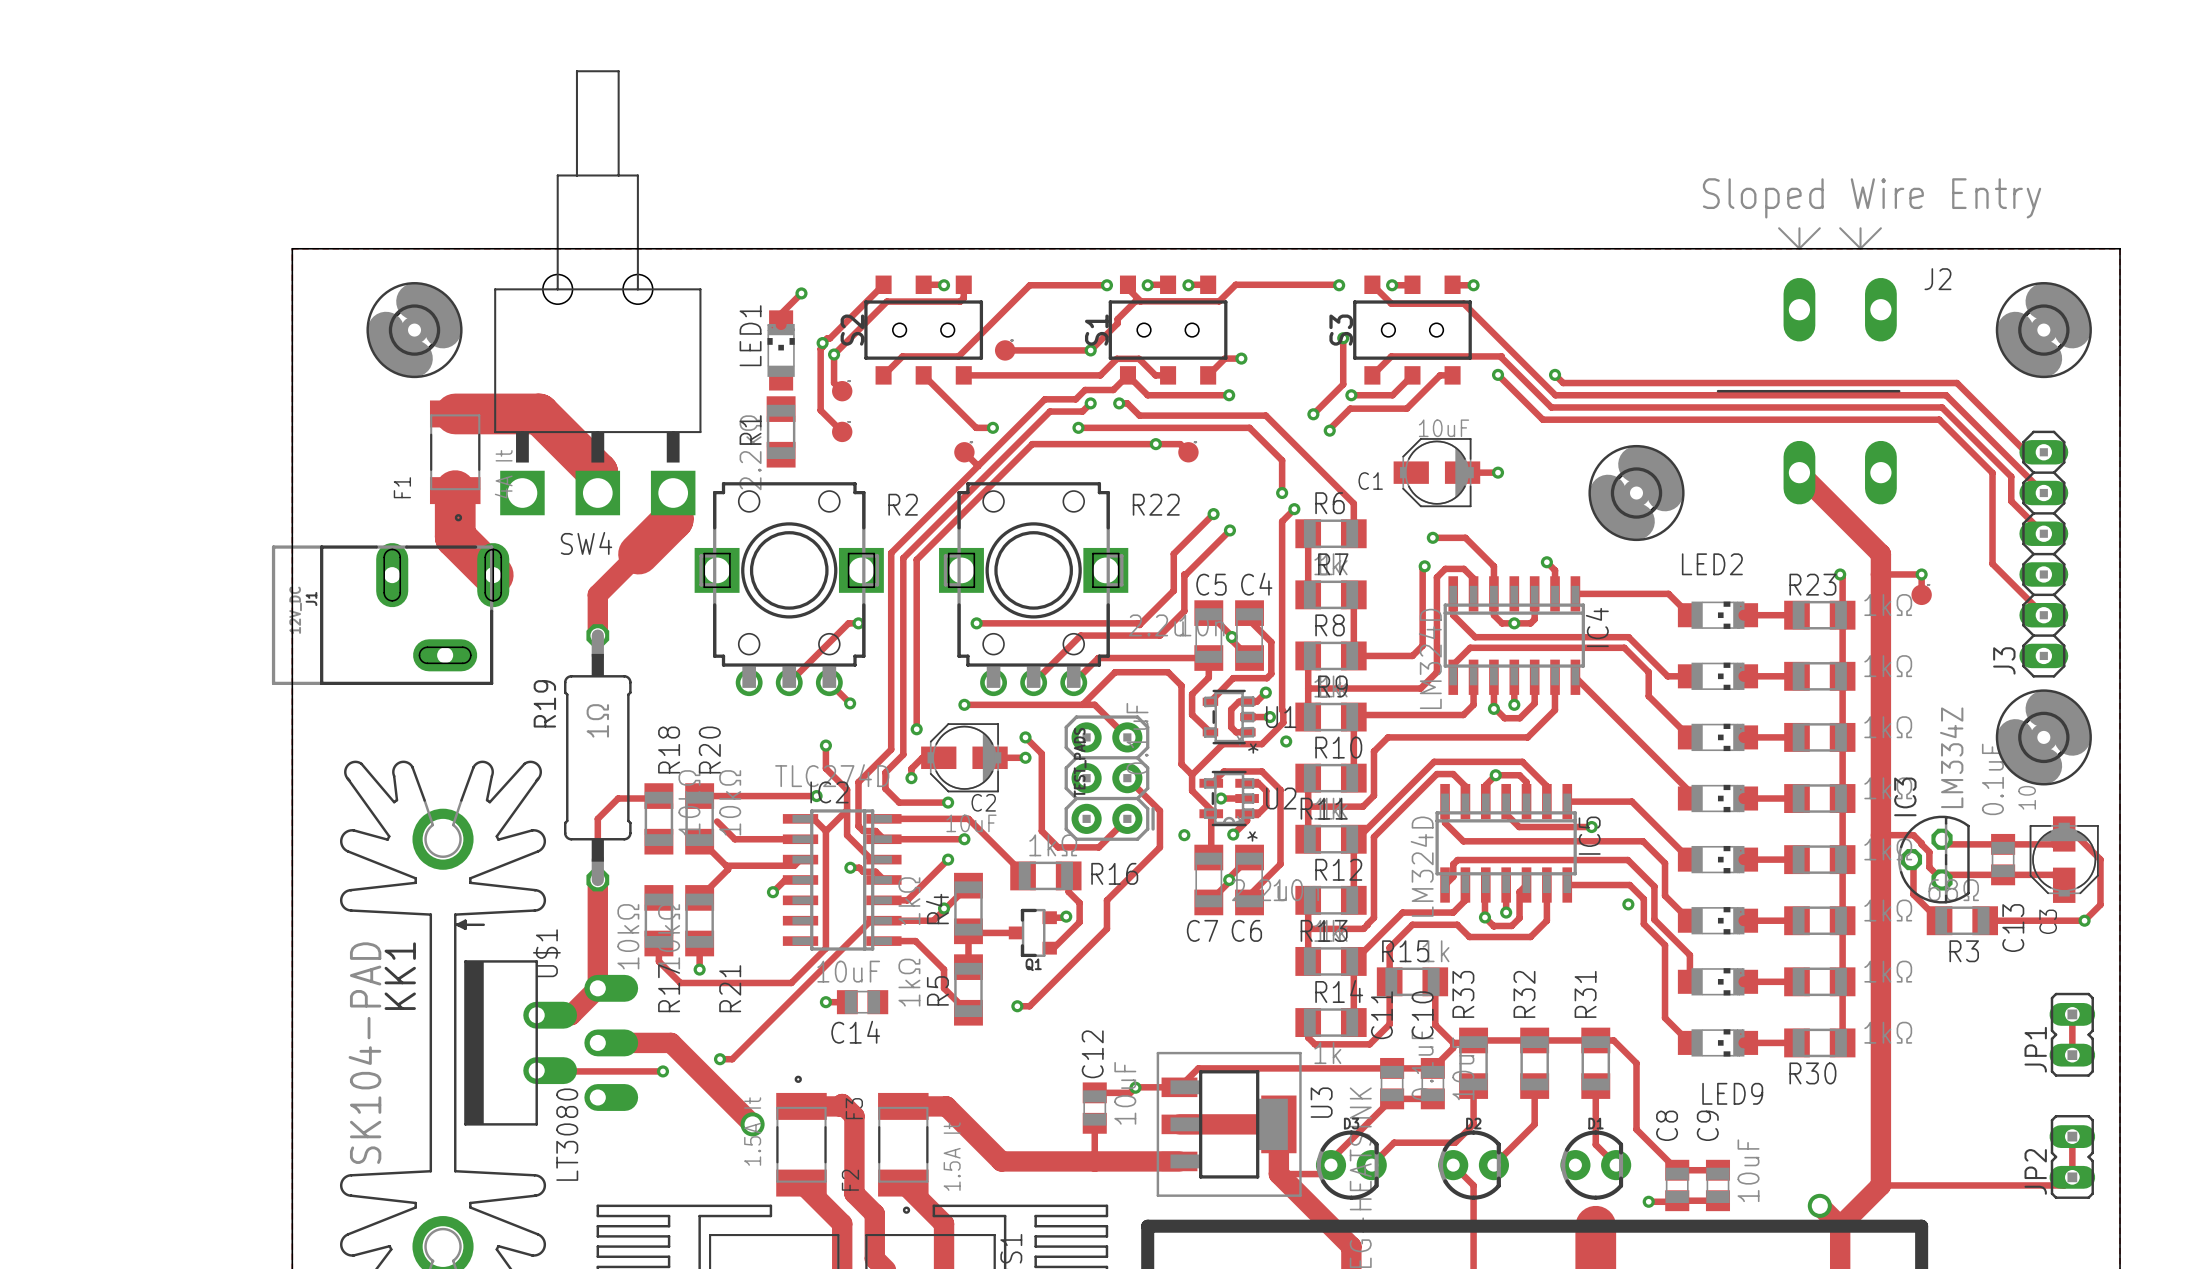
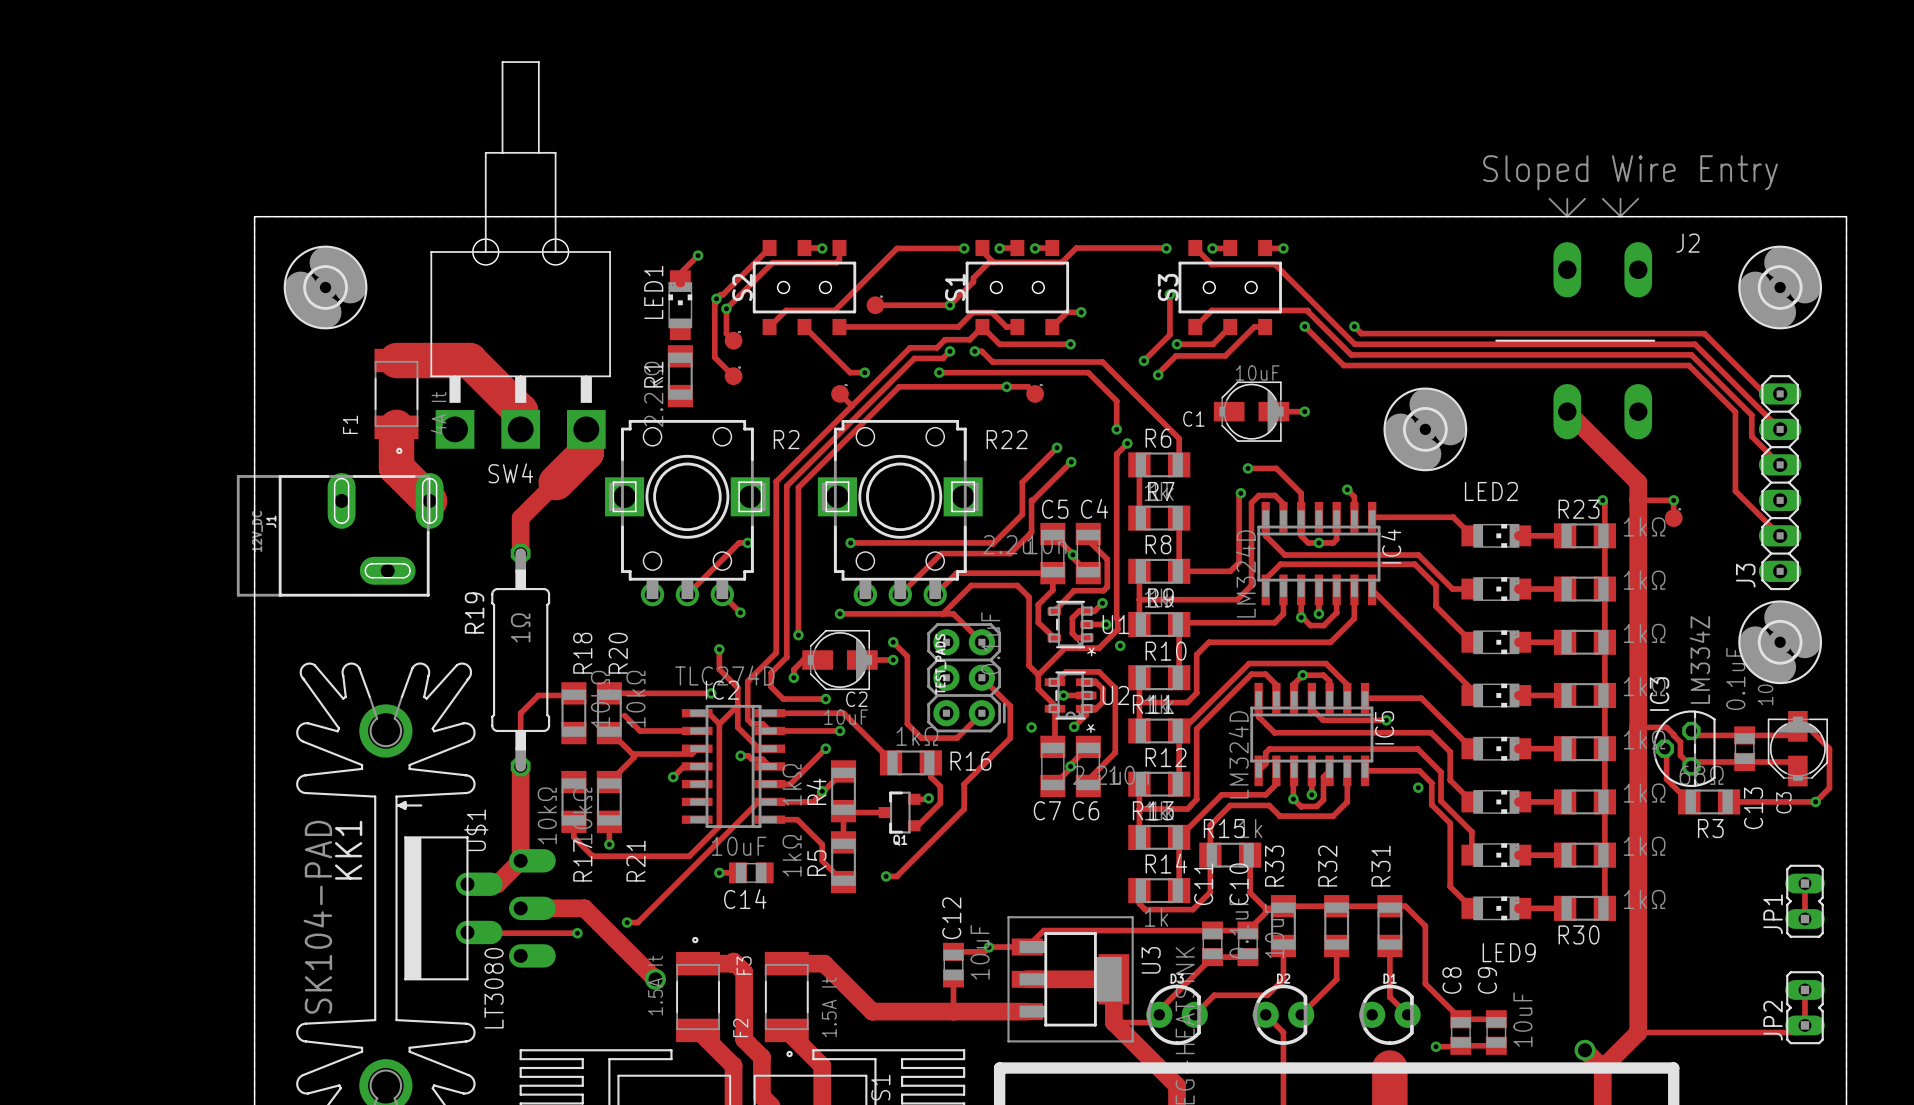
part position: (414, 330) -> (325, 287)

